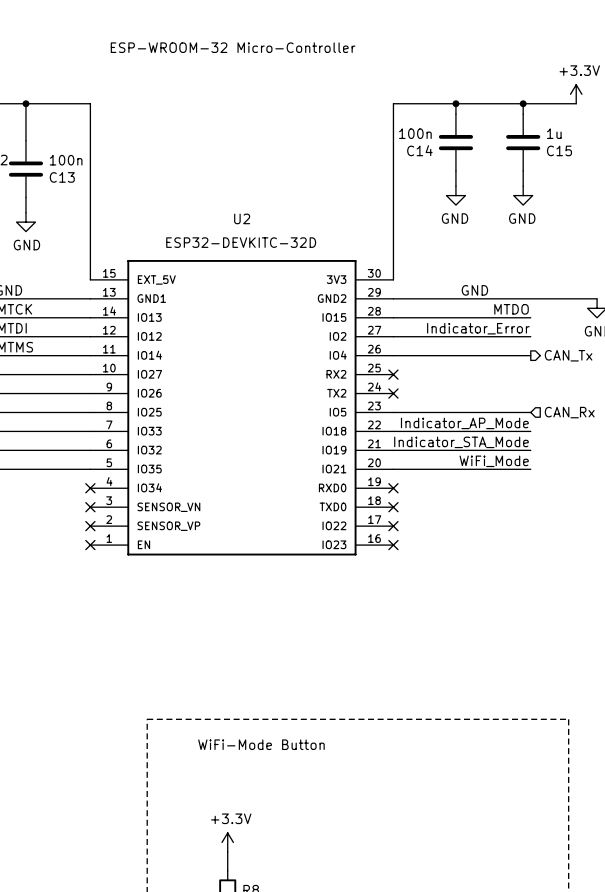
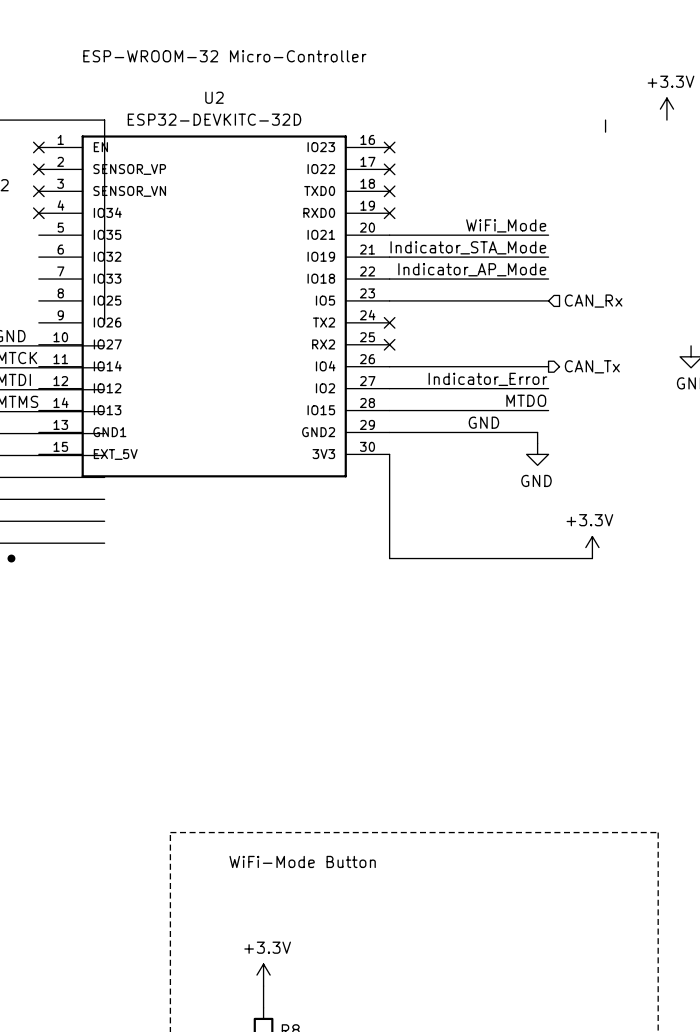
text position: ESP-WROOM-32 Micro-Controller (233, 47) -> ESP-WROOM-32 Micro-Controller (224, 56)
wire: (25, 103) (25, 140) -> none
junction: (25, 103) -> none
wire: (455, 103) (455, 114) -> none
junction: (455, 103) -> none
junction: (523, 103) -> none
wire: (576, 103) (393, 103) (393, 279) -> none
no-connect mark: none -> (38, 147)
no-connect mark: none -> (389, 147)
C14: 100n (455, 142) -> none
C15: 1u (523, 142) -> none
no-connect mark: none -> (38, 169)
no-connect mark: none -> (389, 169)
no-connect mark: none -> (38, 191)
no-connect mark: none -> (389, 191)
C13: 100n (25, 169) -> none
wire: (455, 170) (455, 186) -> none
wire: (523, 170) (523, 186) -> none
no-connect mark: none -> (38, 213)
no-connect mark: none -> (389, 213)
label: none -> WiFi_Mode (506, 225)
power symbol: GND (455, 195) -> none
power symbol: GND (523, 195) -> none
wire: (25, 197) (25, 212) -> none
wire: none -> (389, 235) (548, 235)
label: none -> Indicator_STA_Mode (468, 247)
power symbol: GND (25, 222) -> none
label: none -> Indicator_AP_Mode (472, 269)
no-connect mark: none -> (389, 322)
label position: GND (474, 290) -> GND (483, 422)
no-connect mark: none -> (389, 344)
wire: (393, 298) (597, 298) -> none
label position: MTDO (511, 309) -> MTDO (526, 400)
wire: (393, 317) (530, 317) -> (389, 257) (548, 257)
label position: Indicator_Error (478, 328) -> Indicator_Error (487, 379)
wire: (393, 336) (530, 336) -> (389, 279) (548, 279)
wire: (393, 355) (530, 355) -> (389, 300) (548, 300)
hierarchical label position: CAN_Tx (568, 355) -> CAN_Tx (592, 366)
wire: none -> (389, 432) (537, 432) (537, 443)
no-connect mark: (393, 374) -> none
wire: none -> (389, 454) (389, 558) (592, 558)
power symbol: none -> GND (537, 454)
no-connect mark: (393, 393) -> none
U2 flip: as is (241, 407) -> up-down (214, 306)
wire: (393, 412) (530, 412) -> (389, 366) (548, 366)
hierarchical label position: CAN_Rx (569, 412) -> CAN_Rx (593, 301)
label: Indicator_AP_Mode (464, 423) -> none
wire: (393, 431) (530, 431) -> (389, 388) (548, 388)
label: Indicator_STA_Mode (461, 442) -> none
wire: (393, 450) (530, 450) -> (389, 410) (548, 410)
label: WiFi_Mode (494, 461) -> none
wire: (393, 469) (530, 469) -> none
power symbol: none -> +3.3V (592, 547)
junction: none -> (11, 558)
no-connect mark: (90, 488) -> none
no-connect mark: (393, 488) -> none
no-connect mark: (90, 507) -> none
no-connect mark: (393, 507) -> none
no-connect mark: (90, 526) -> none
no-connect mark: (393, 526) -> none
no-connect mark: (90, 545) -> none
no-connect mark: (393, 545) -> none

